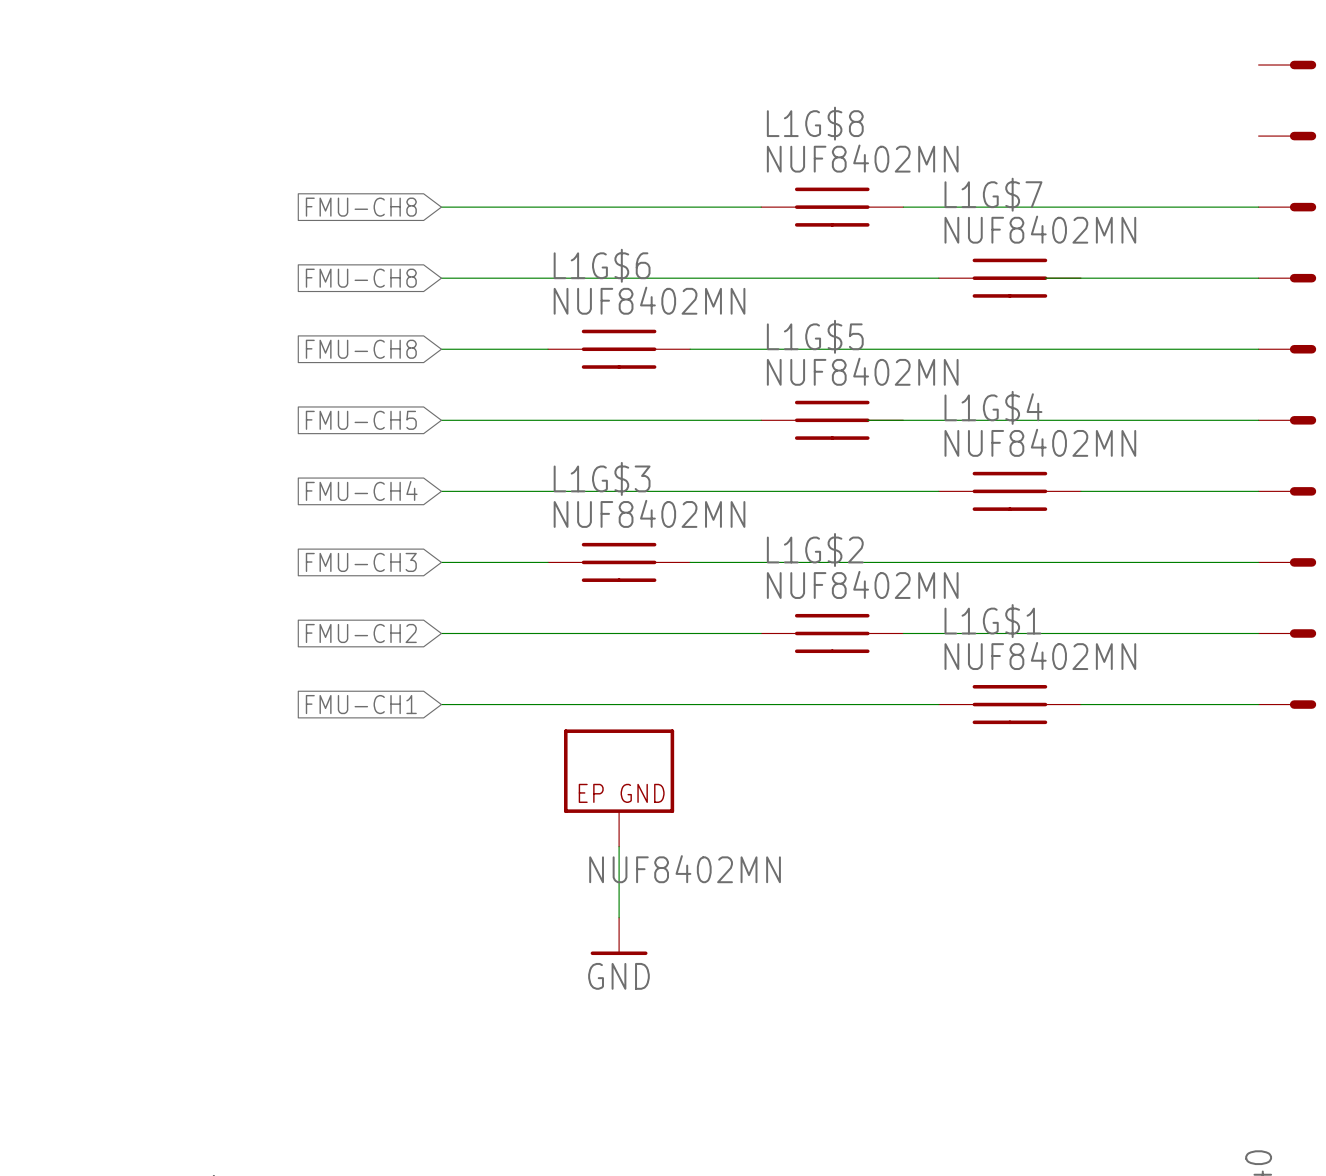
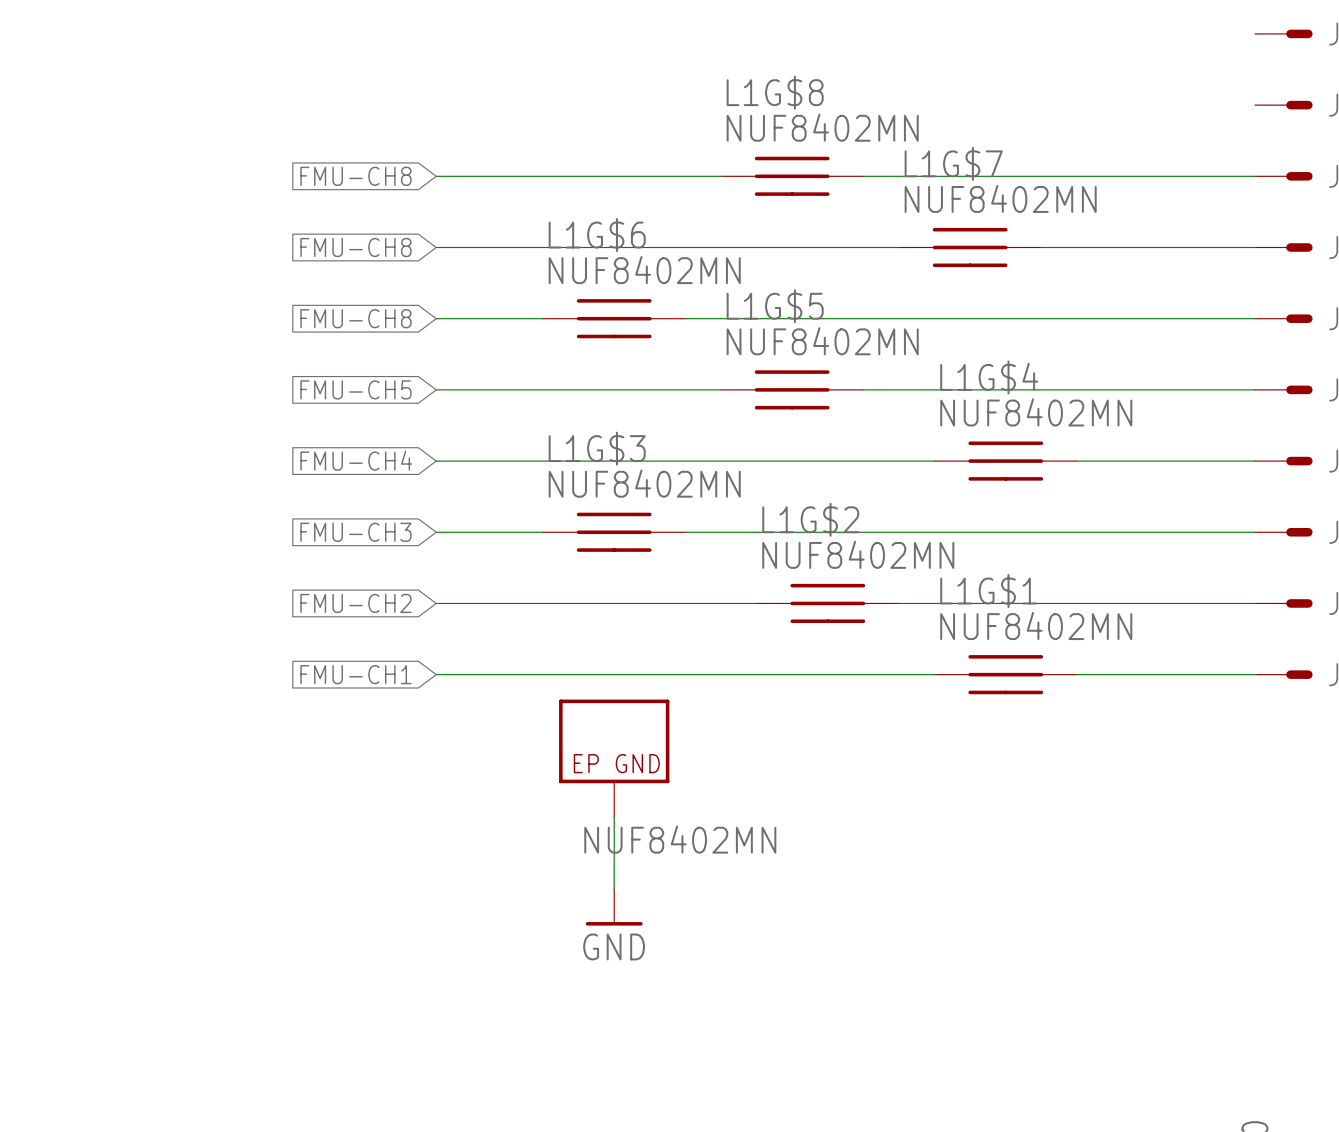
L1G$8 position: (832, 207) -> (792, 176)
L1G$7 position: (1009, 278) -> (970, 247)
L1G$5 position: (832, 420) -> (792, 389)

